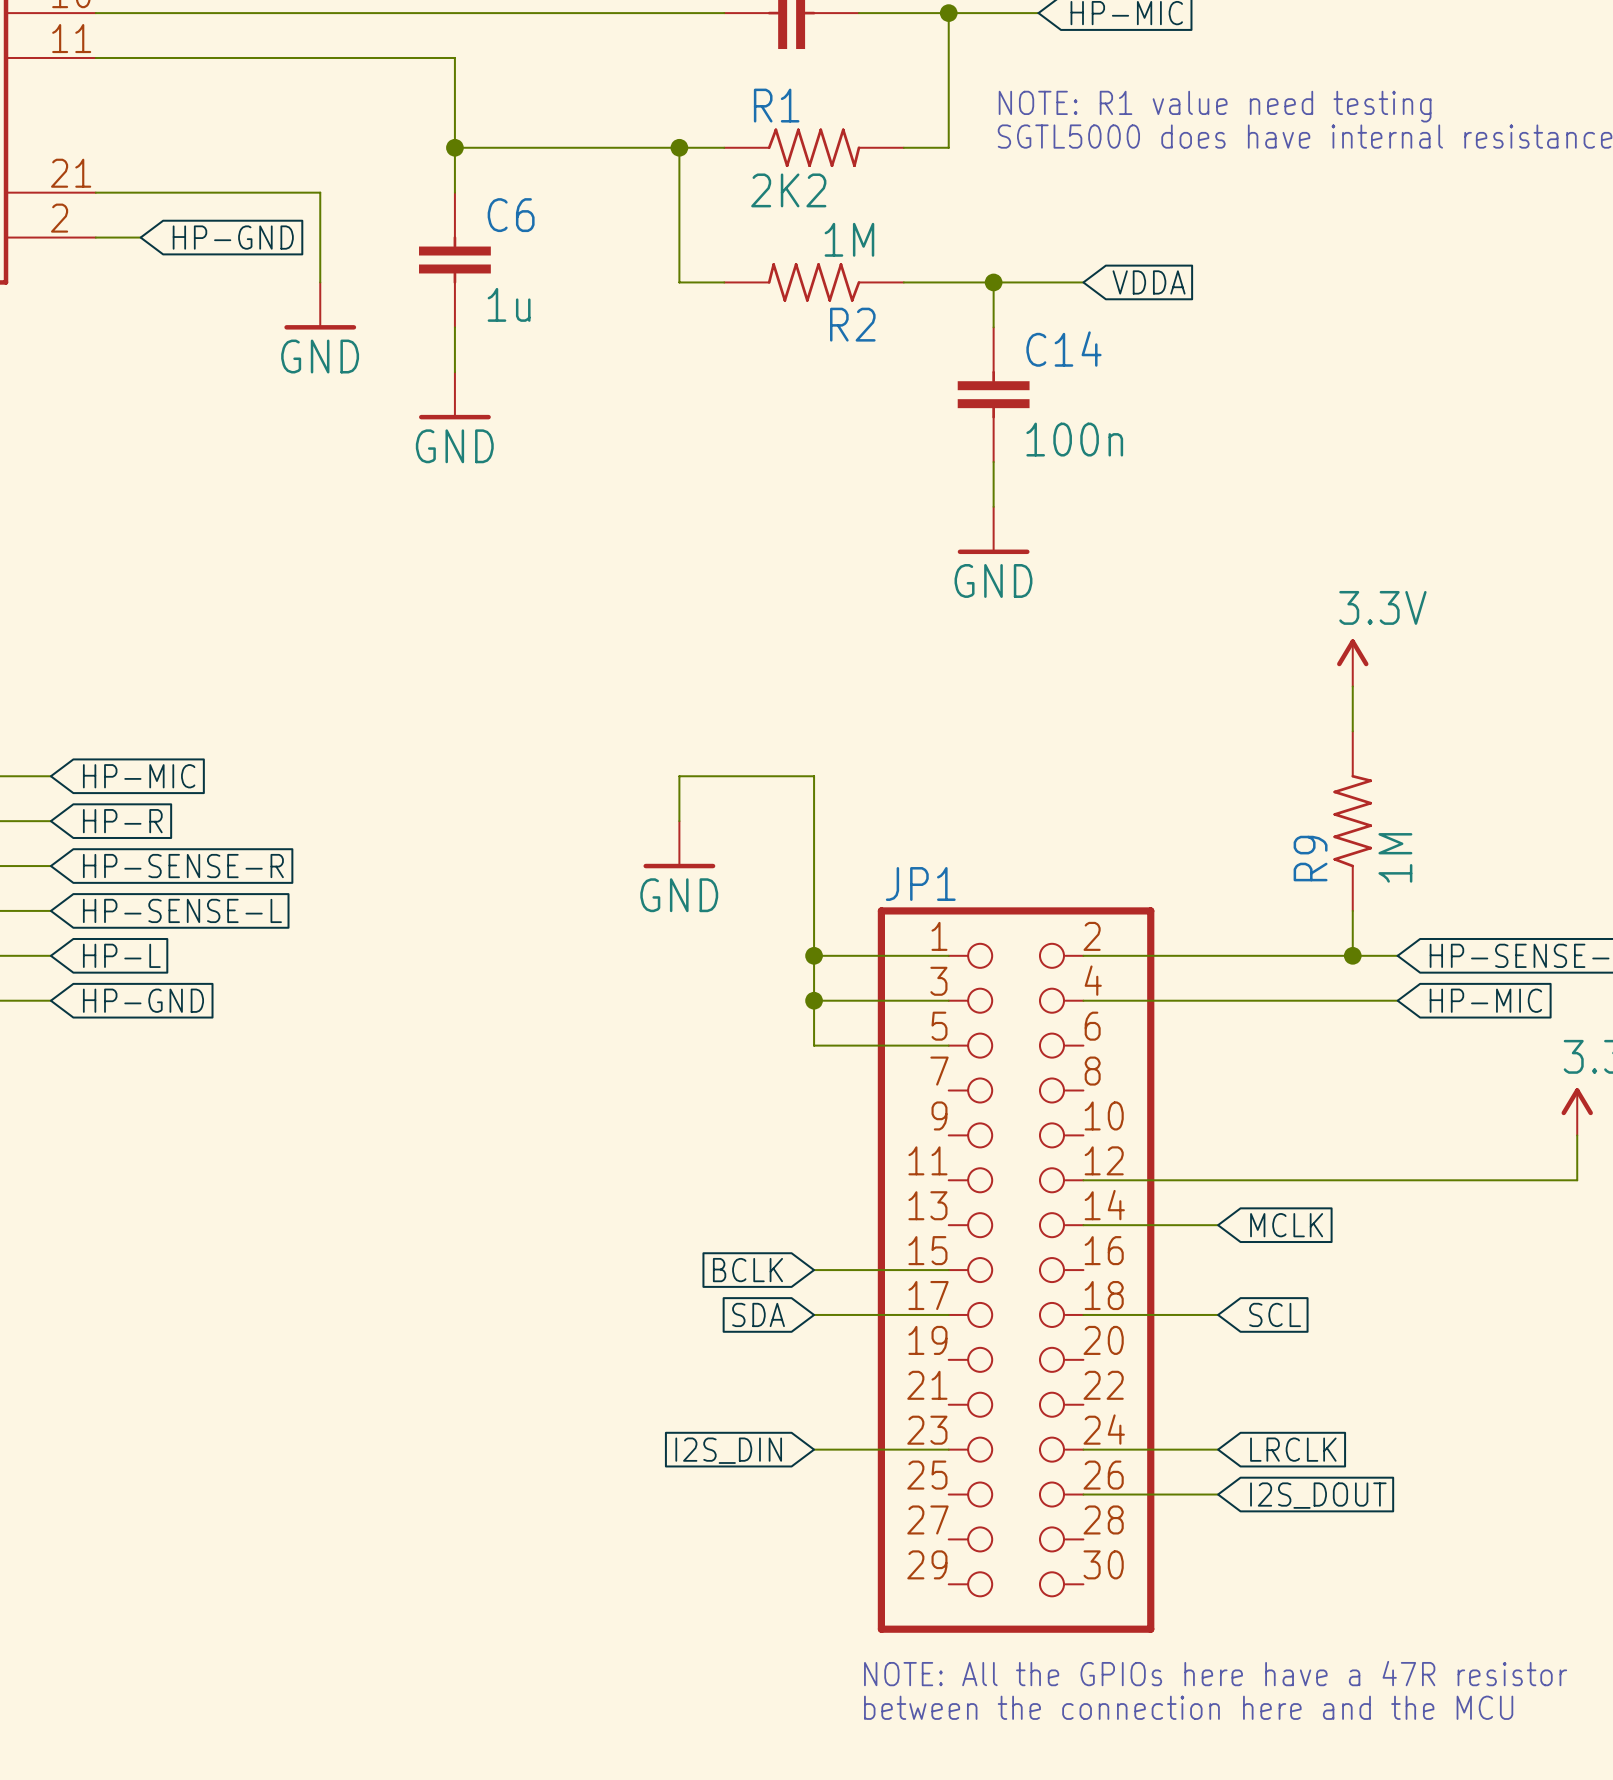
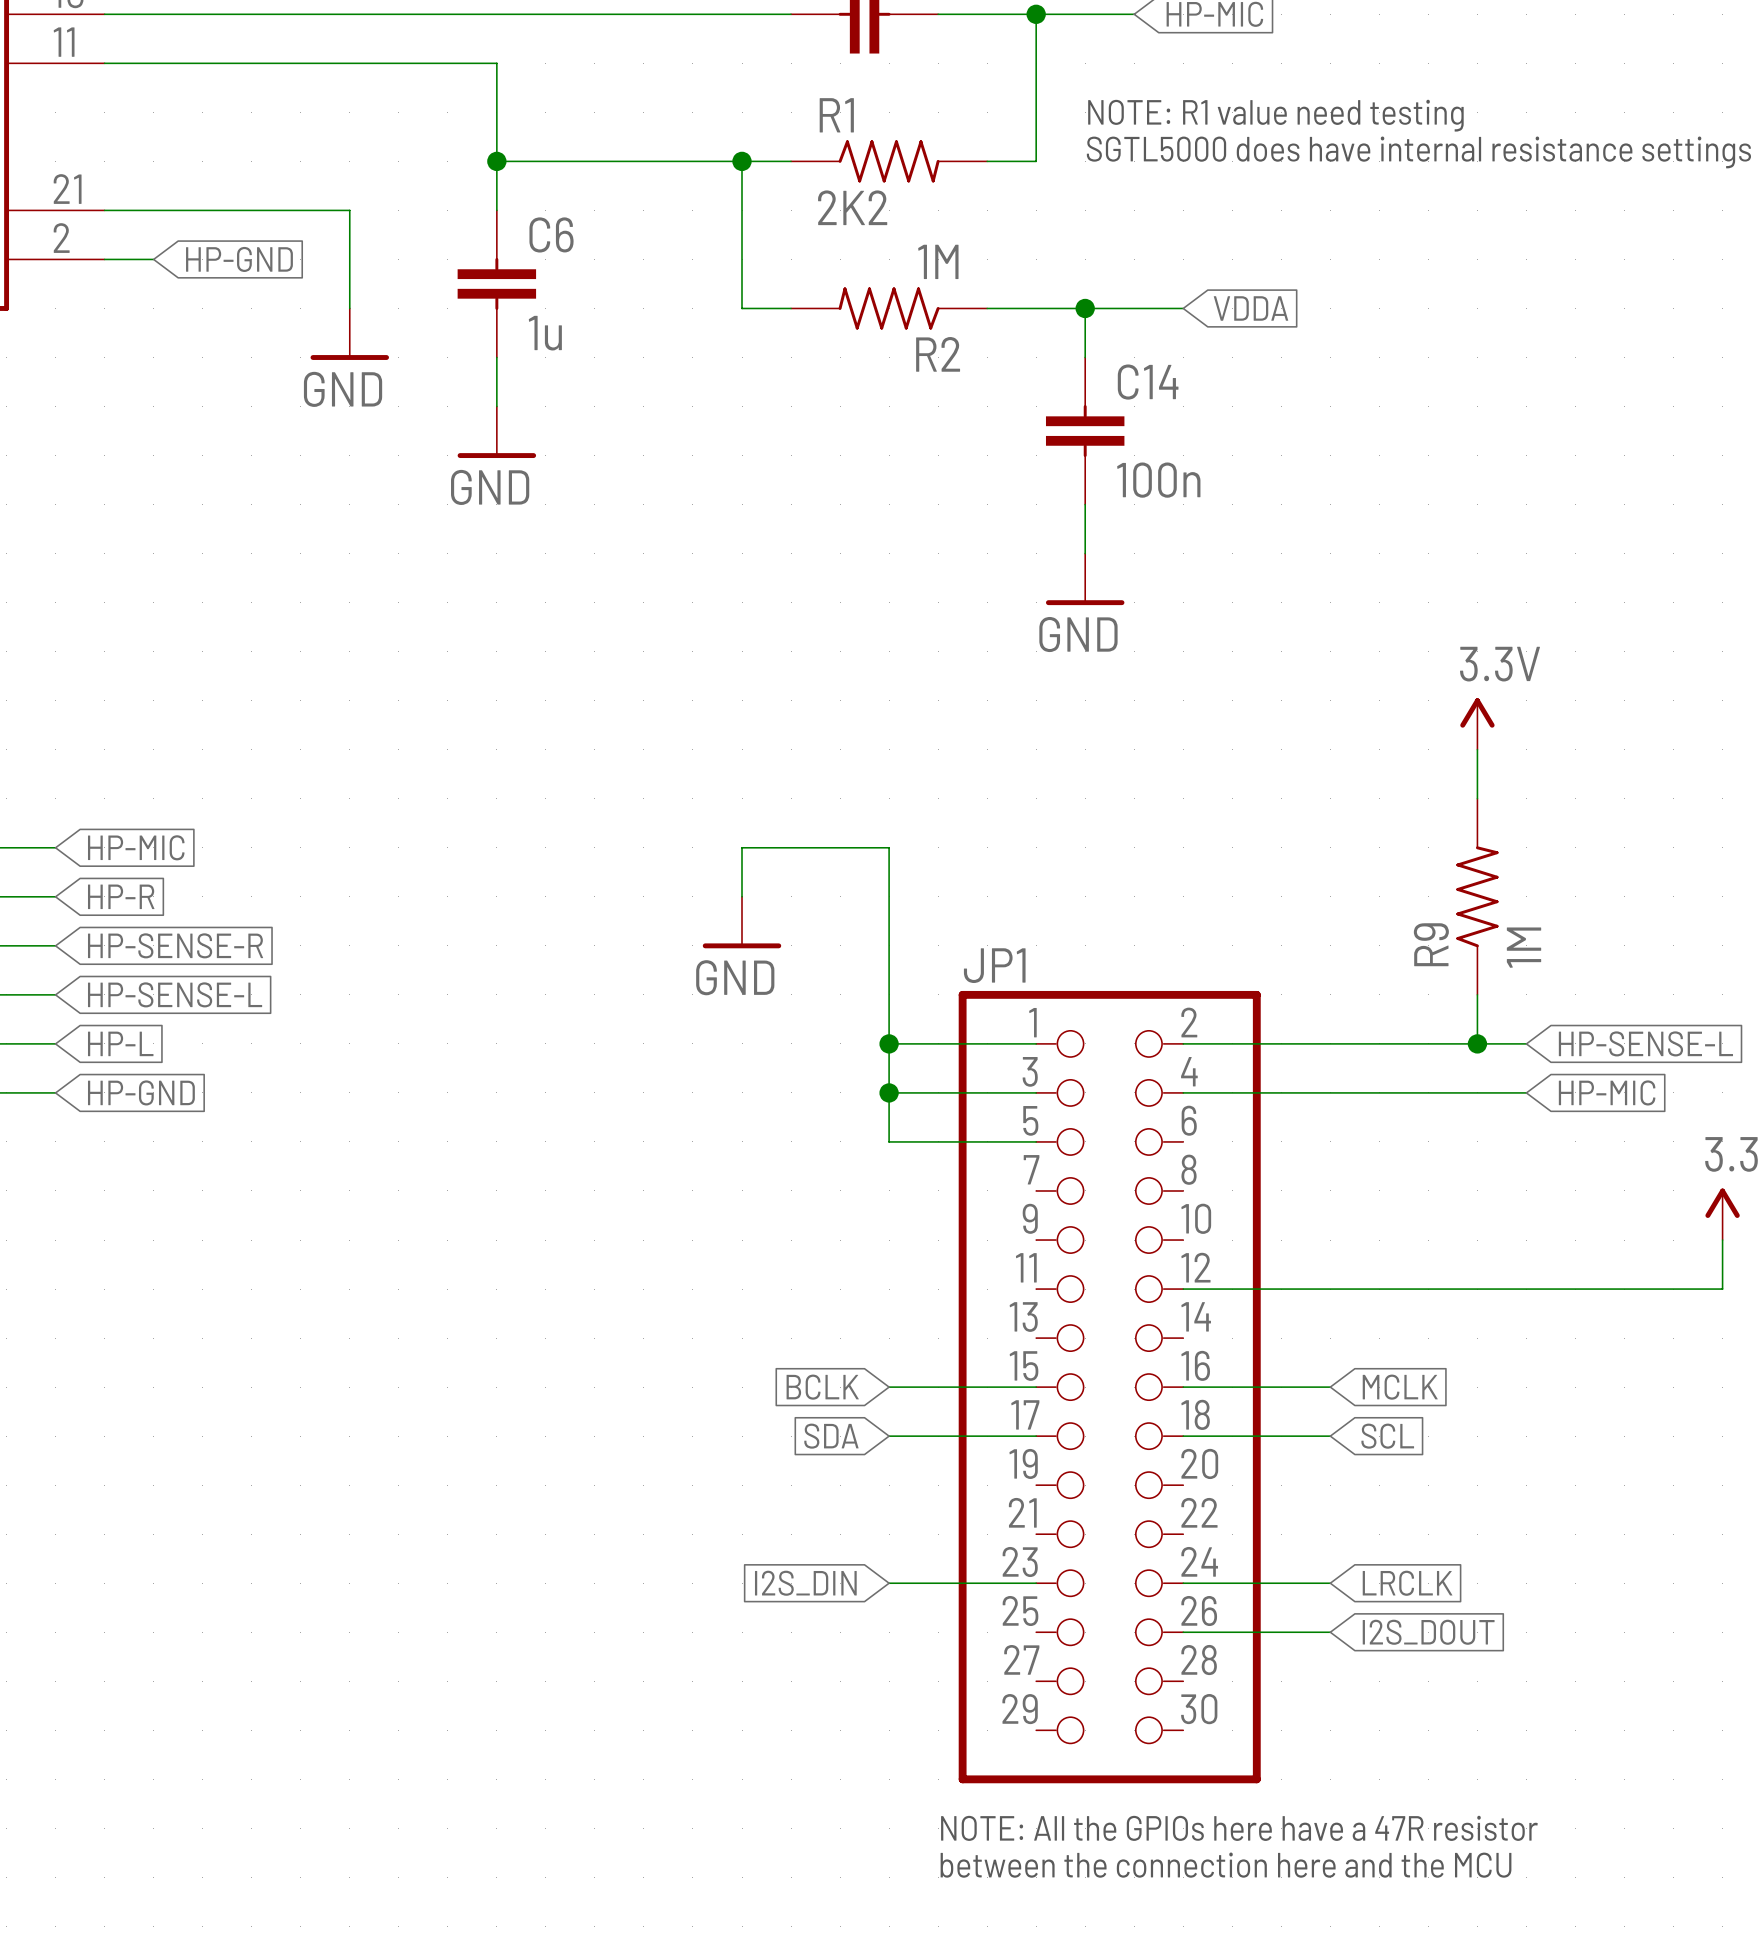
wire: (1083, 1225) (1218, 1225) -> (1183, 1387) (1330, 1387)
global label position: MCLK (1286, 1225) -> MCLK (1400, 1387)

